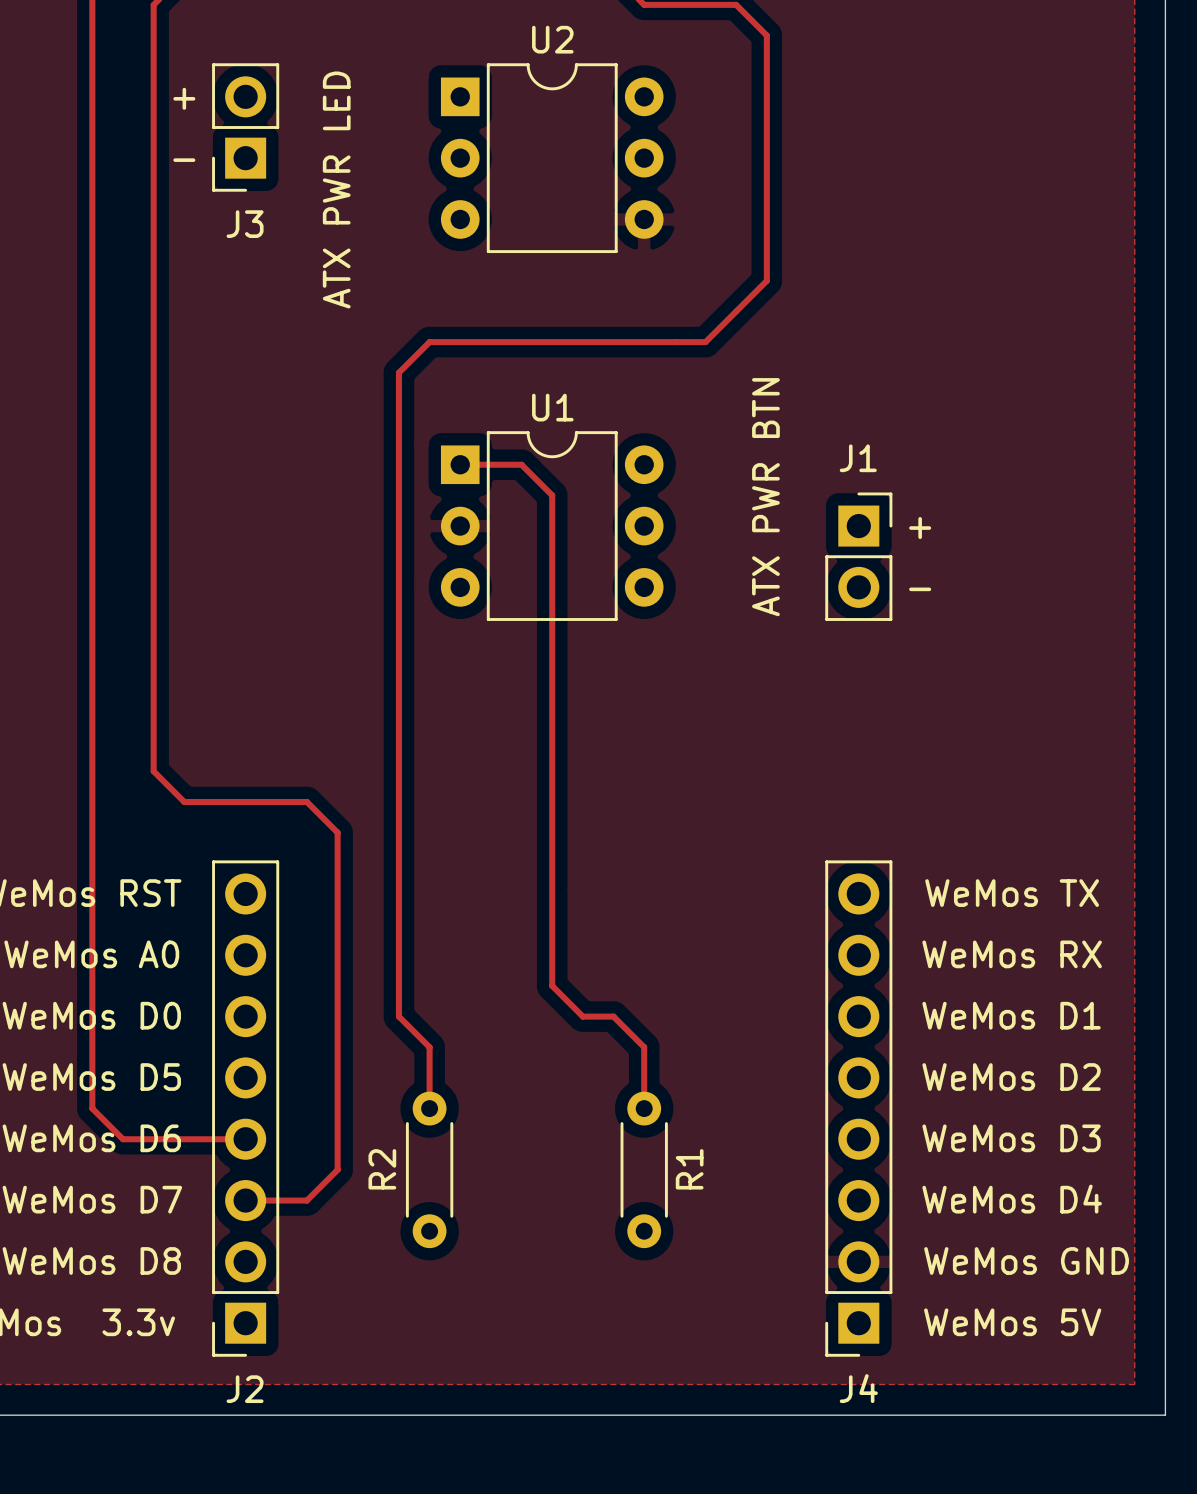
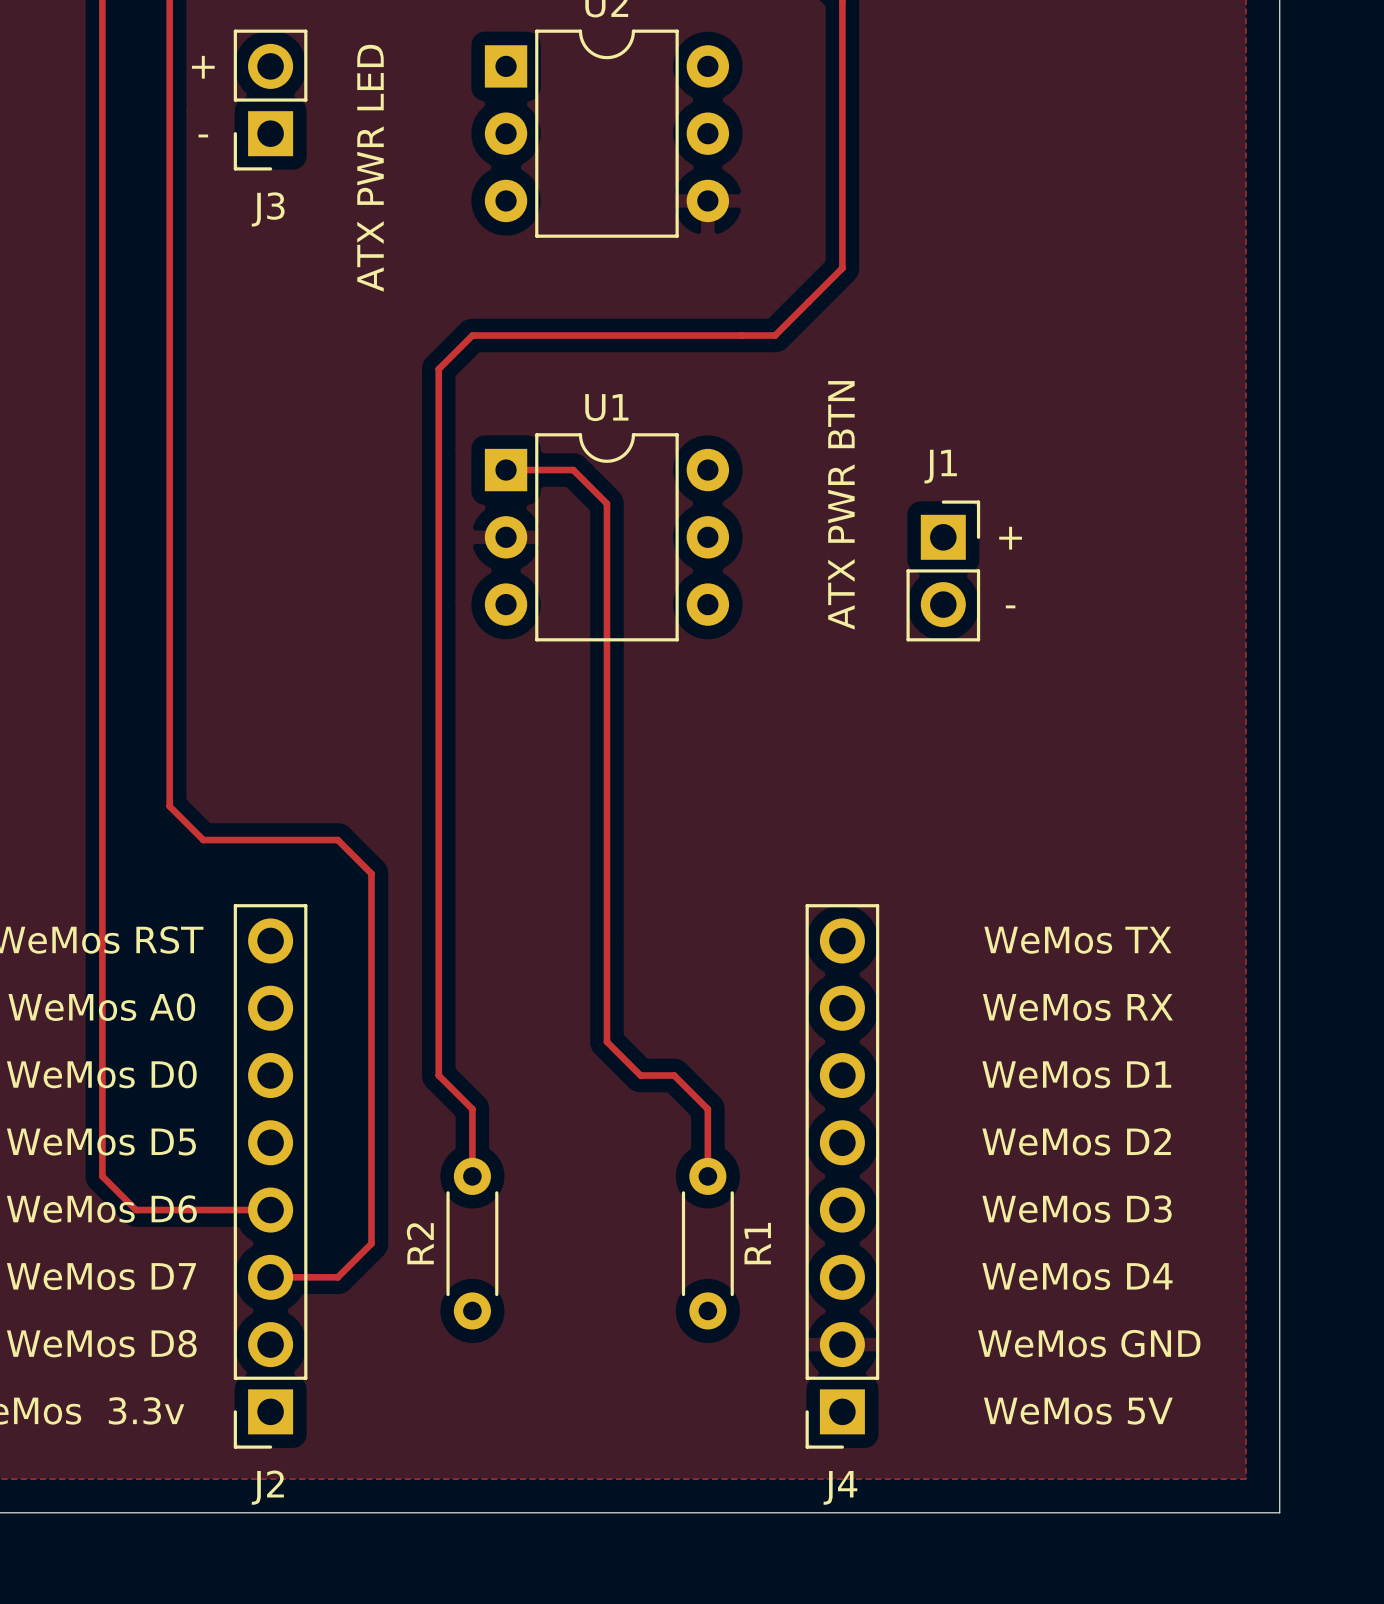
text position: WeMos TX (1012, 893) -> WeMos TX (1077, 940)
text position: WeMos RX (1012, 954) -> WeMos RX (1077, 1007)
text position: WeMos D1 (1011, 1015) -> WeMos D1 (1076, 1074)
text position: WeMos D2 (1011, 1077) -> WeMos D2 (1076, 1141)
J4 position: (858, 1108) -> (842, 1176)
text position: WeMos D3 (1011, 1138) -> WeMos D3 (1077, 1209)
text position: WeMos D4 (1012, 1199) -> WeMos D4 (1077, 1276)
text position: WeMos GND (1026, 1260) -> WeMos GND (1089, 1343)
text position: WeMos 5V (1012, 1322) -> WeMos 5V (1078, 1411)

